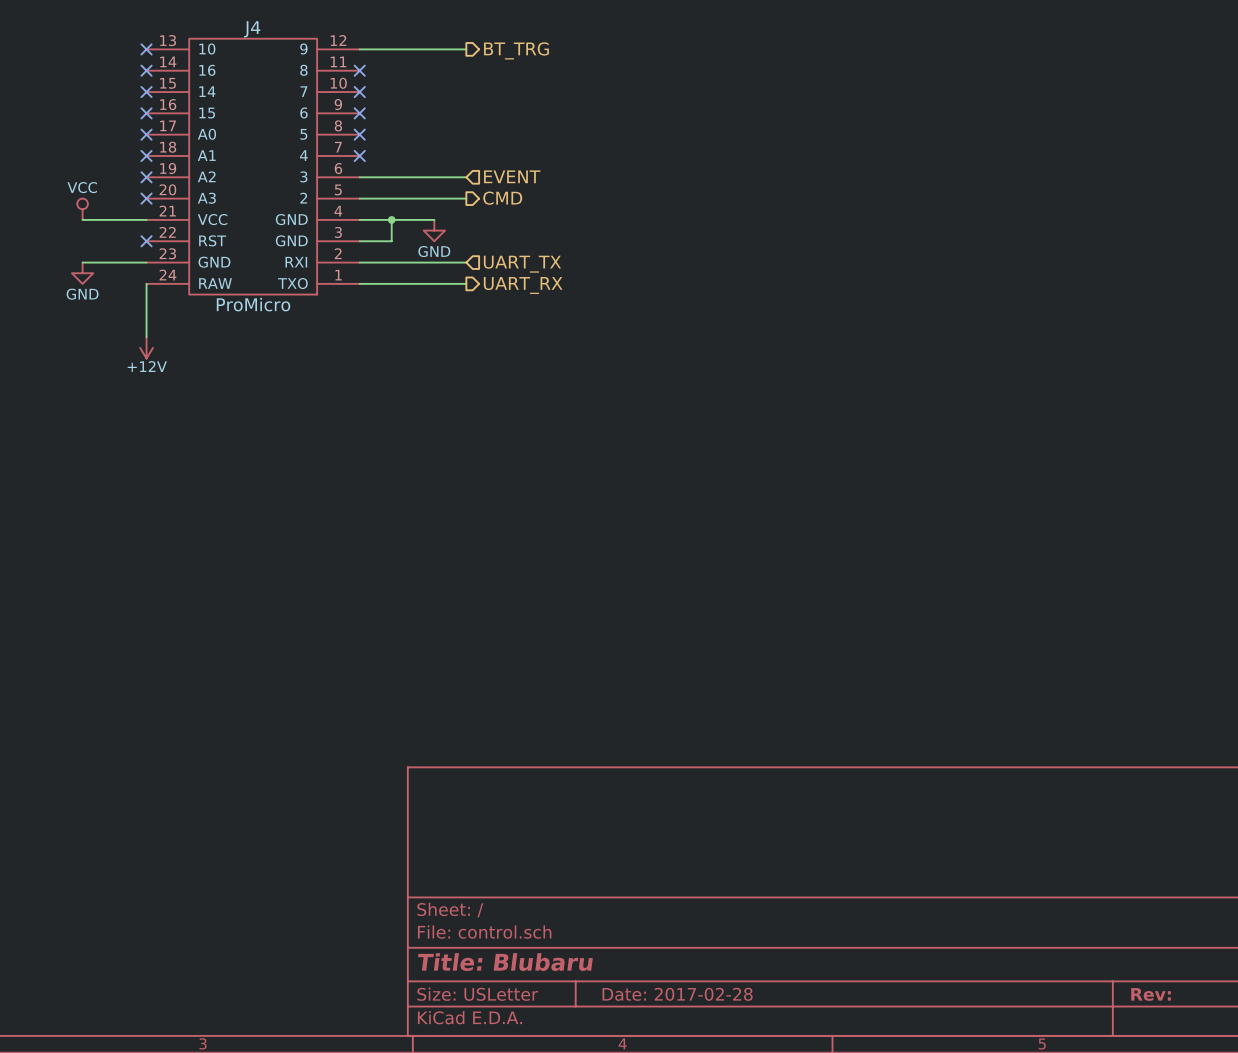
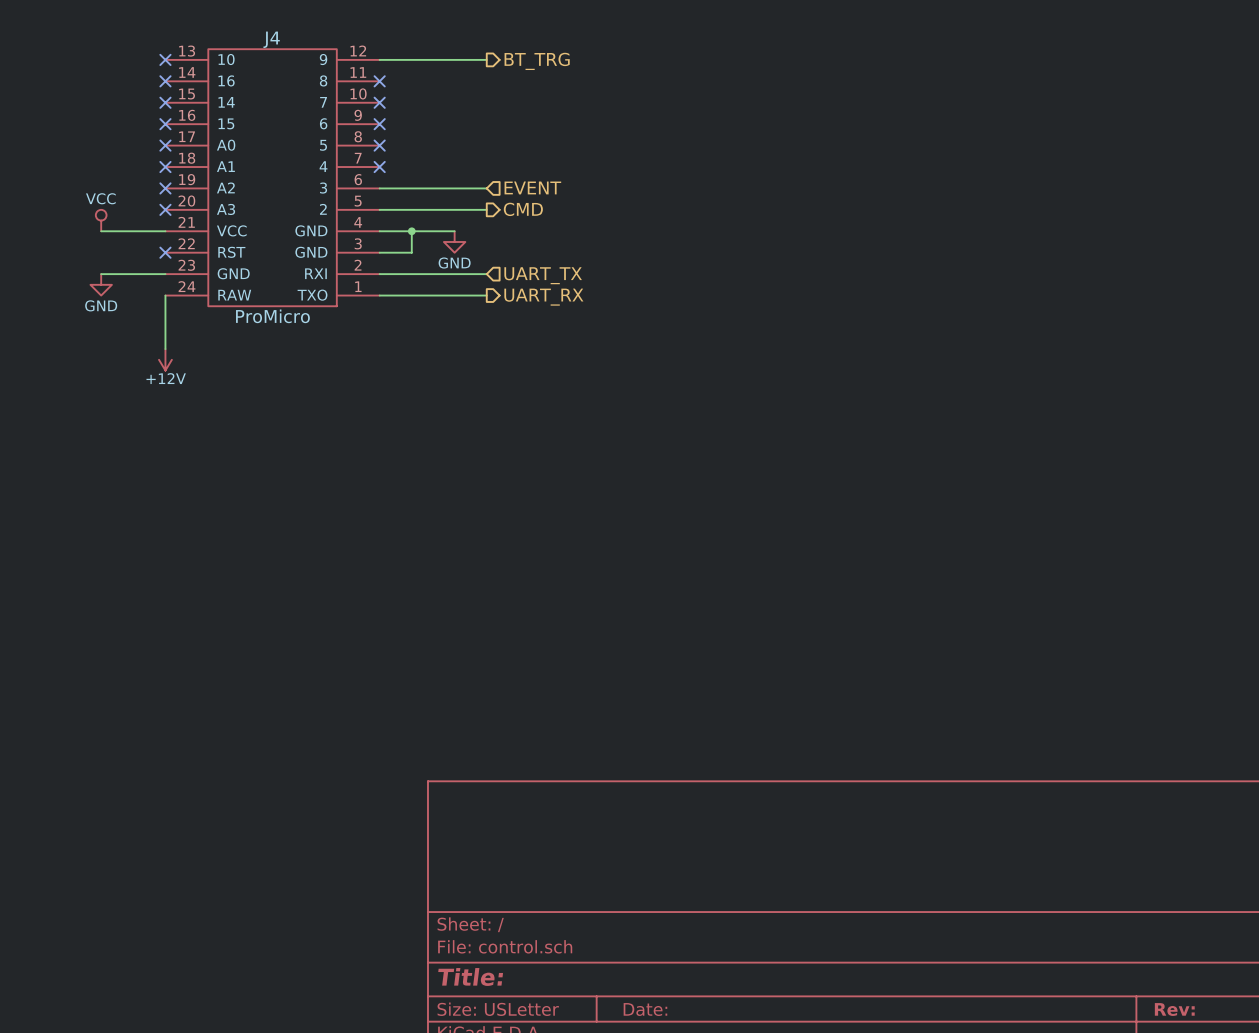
title block: Title: Blubaru (505, 962) -> Title: (470, 976)
title block: Date: 2017-02-28 (677, 994) -> Date: (645, 1009)

